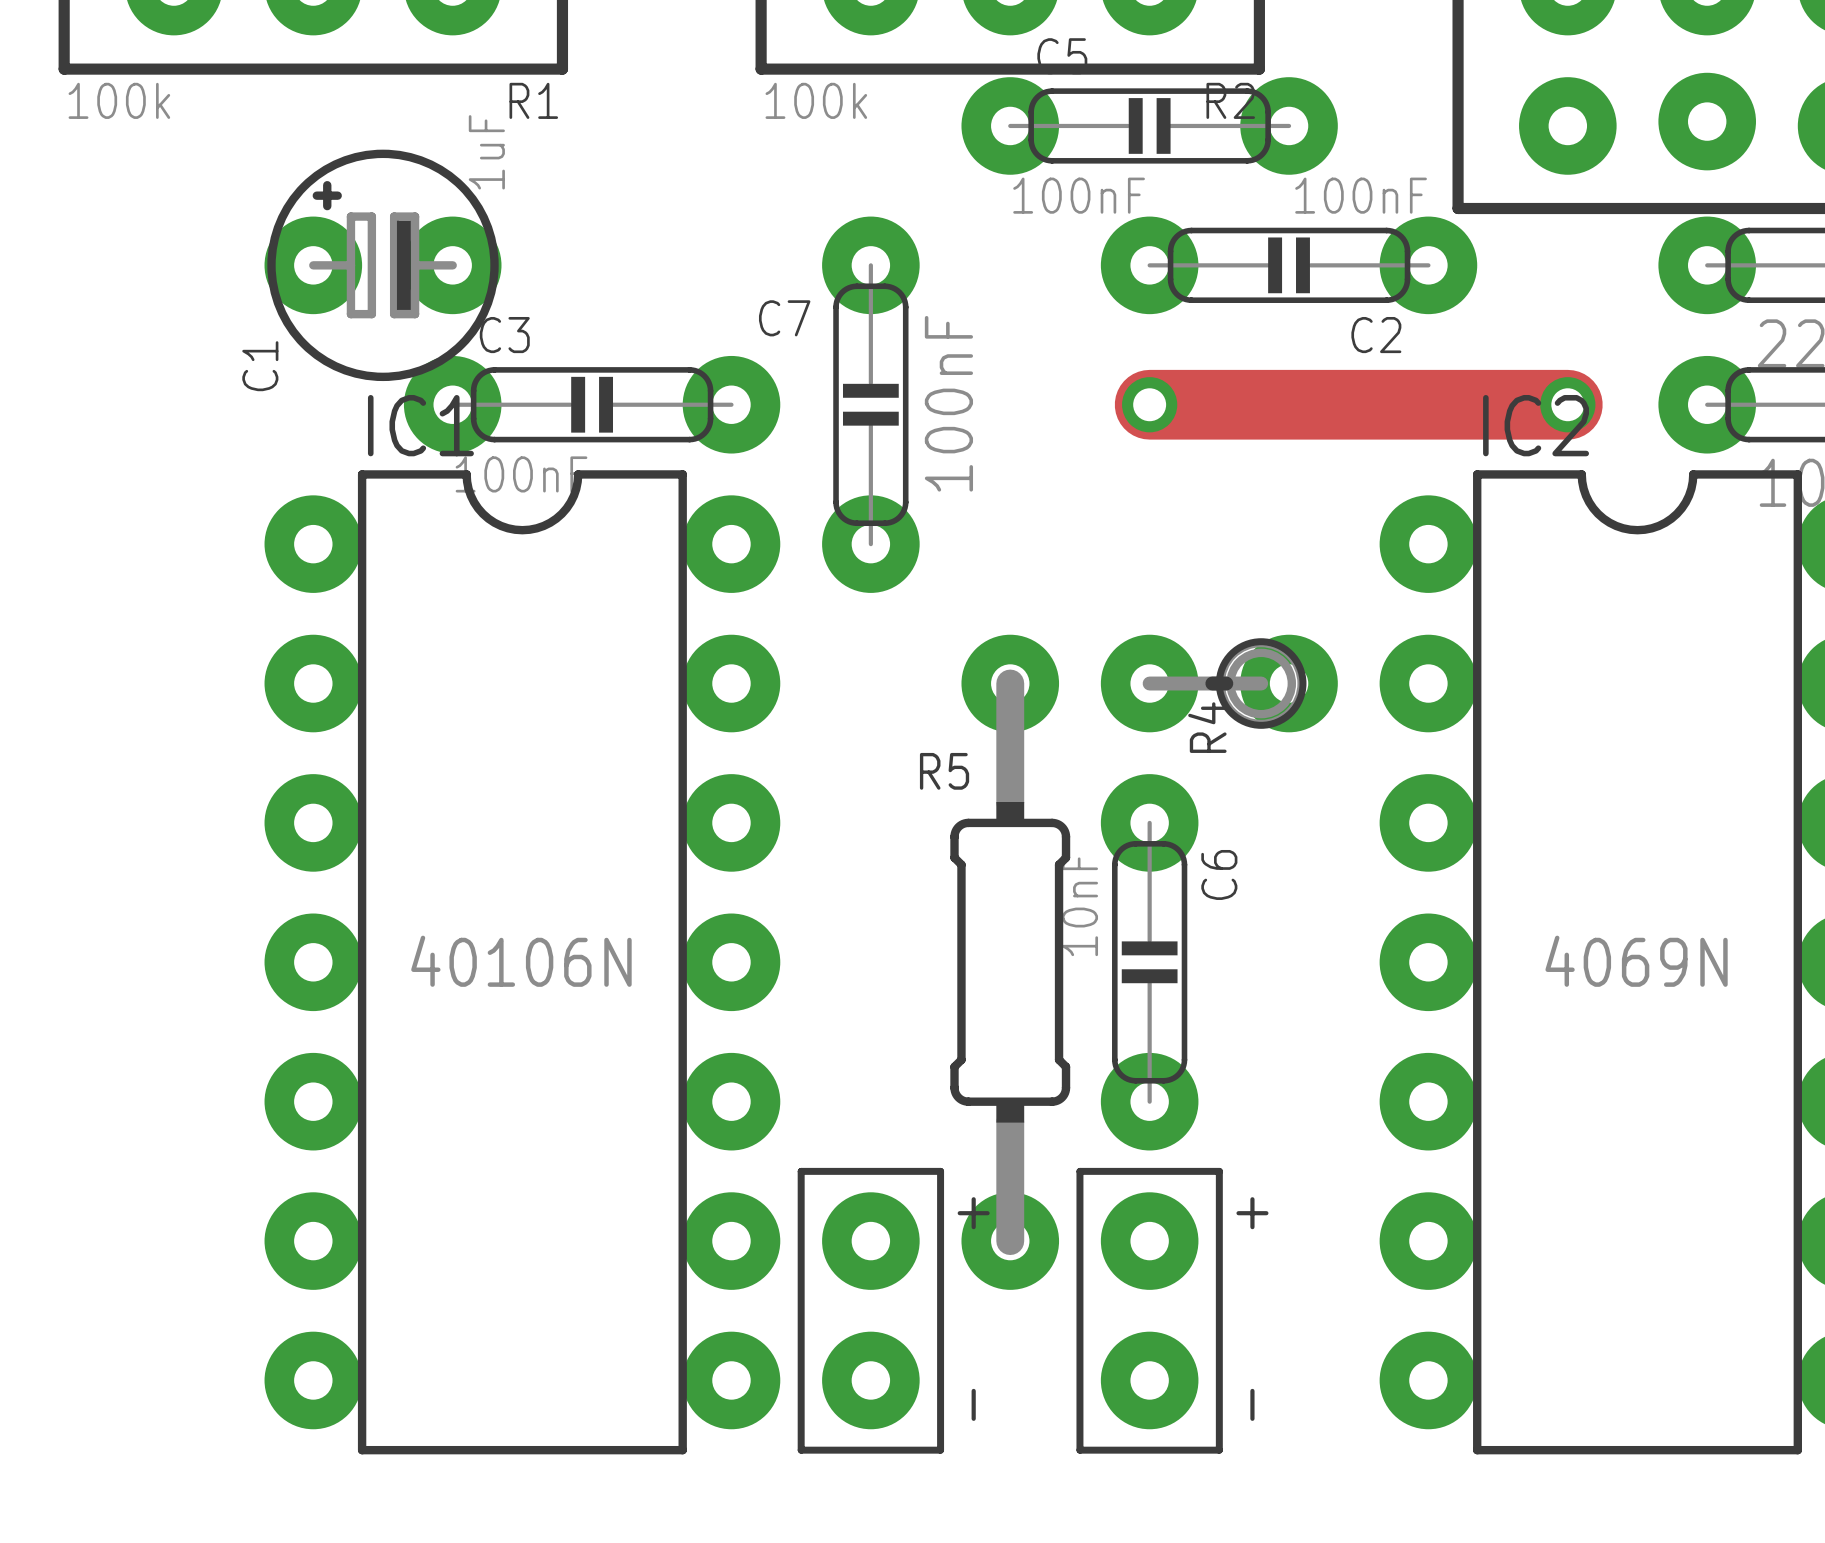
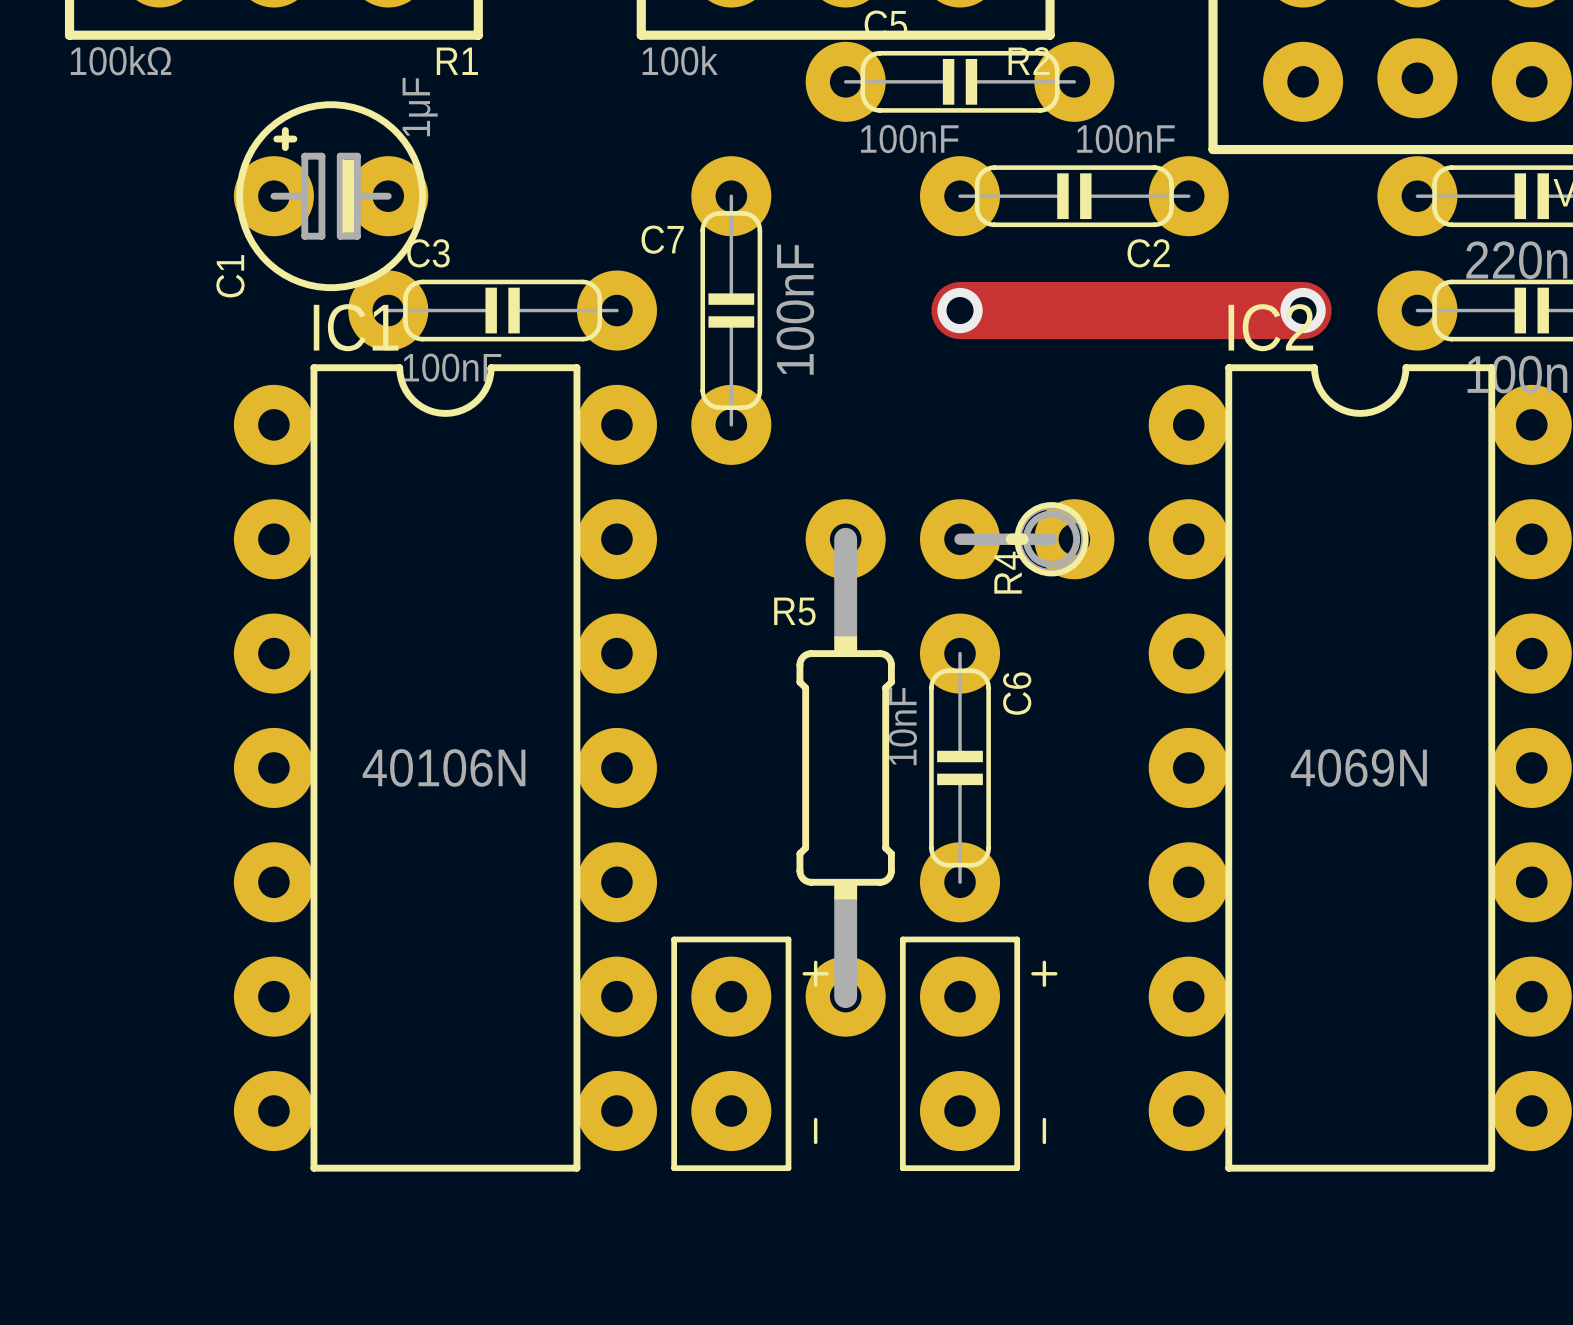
R1 value: 100k (119, 100) -> 100kΩ (121, 60)
C1 value: 1uF (486, 152) -> 1μF (420, 107)

